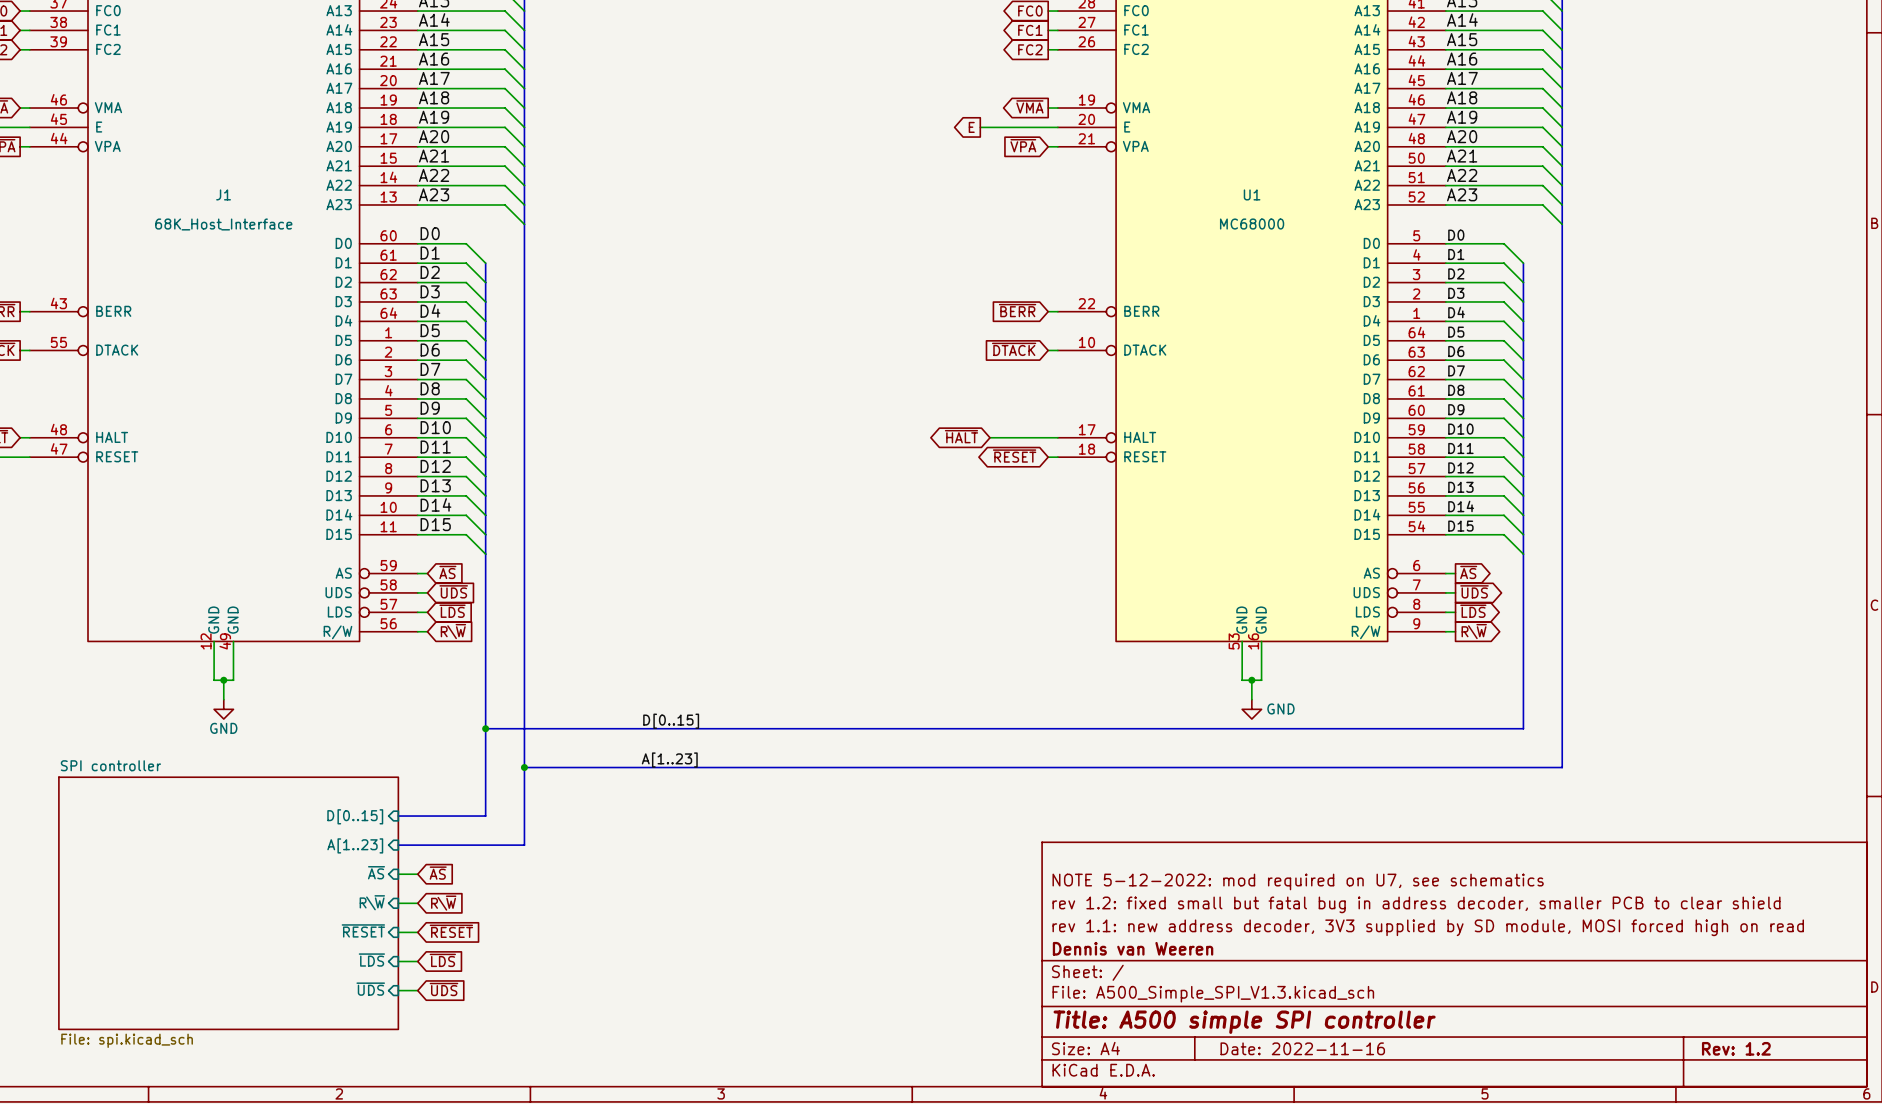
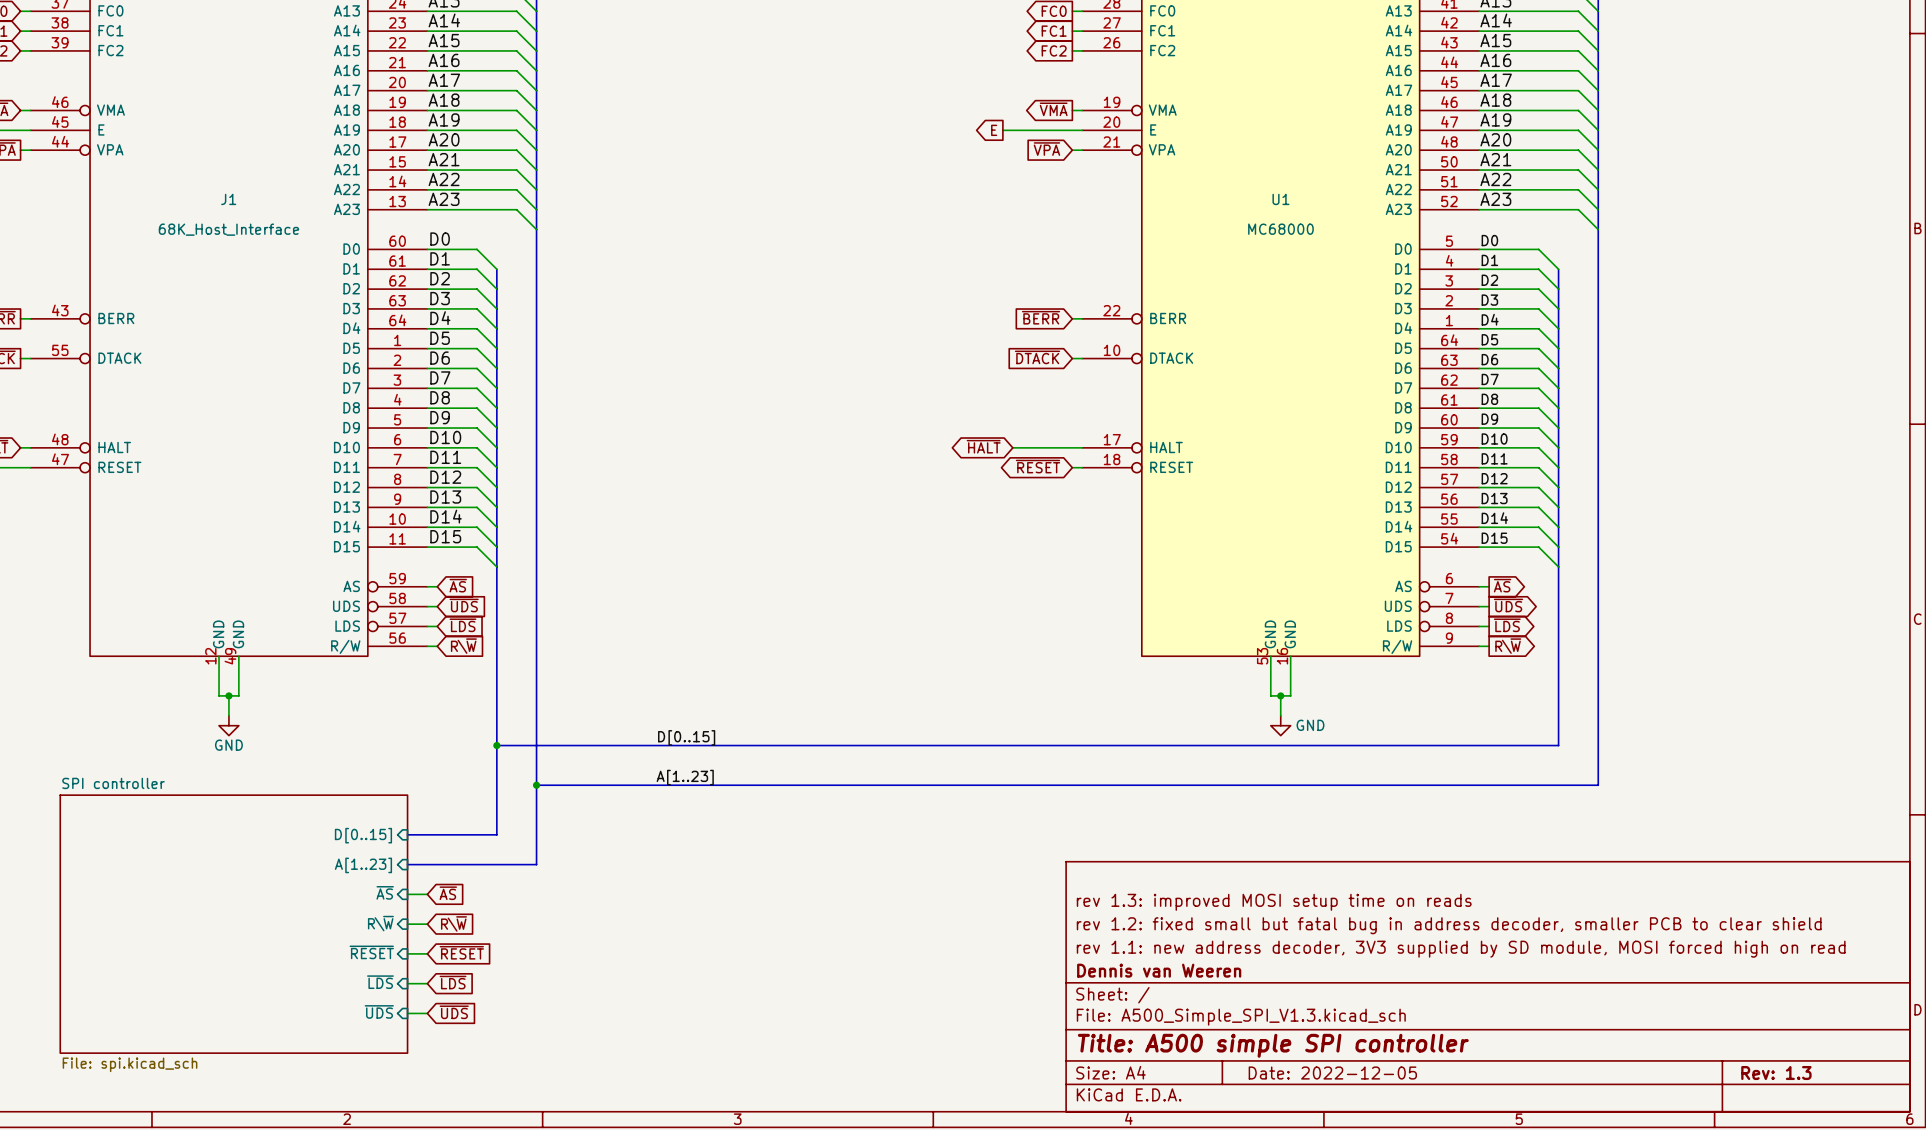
title block: NOTE 5-12-2022: mod required on U7, see schematics (1298, 881) -> rev 1.3: improved MOSI setup time on reads (1274, 902)
title block: Date: 2022-11-16 (1302, 1048) -> Date: 2022-12-05 (1332, 1073)
title block: Rev: 1.2 (1736, 1048) -> Rev: 1.3 (1776, 1073)

